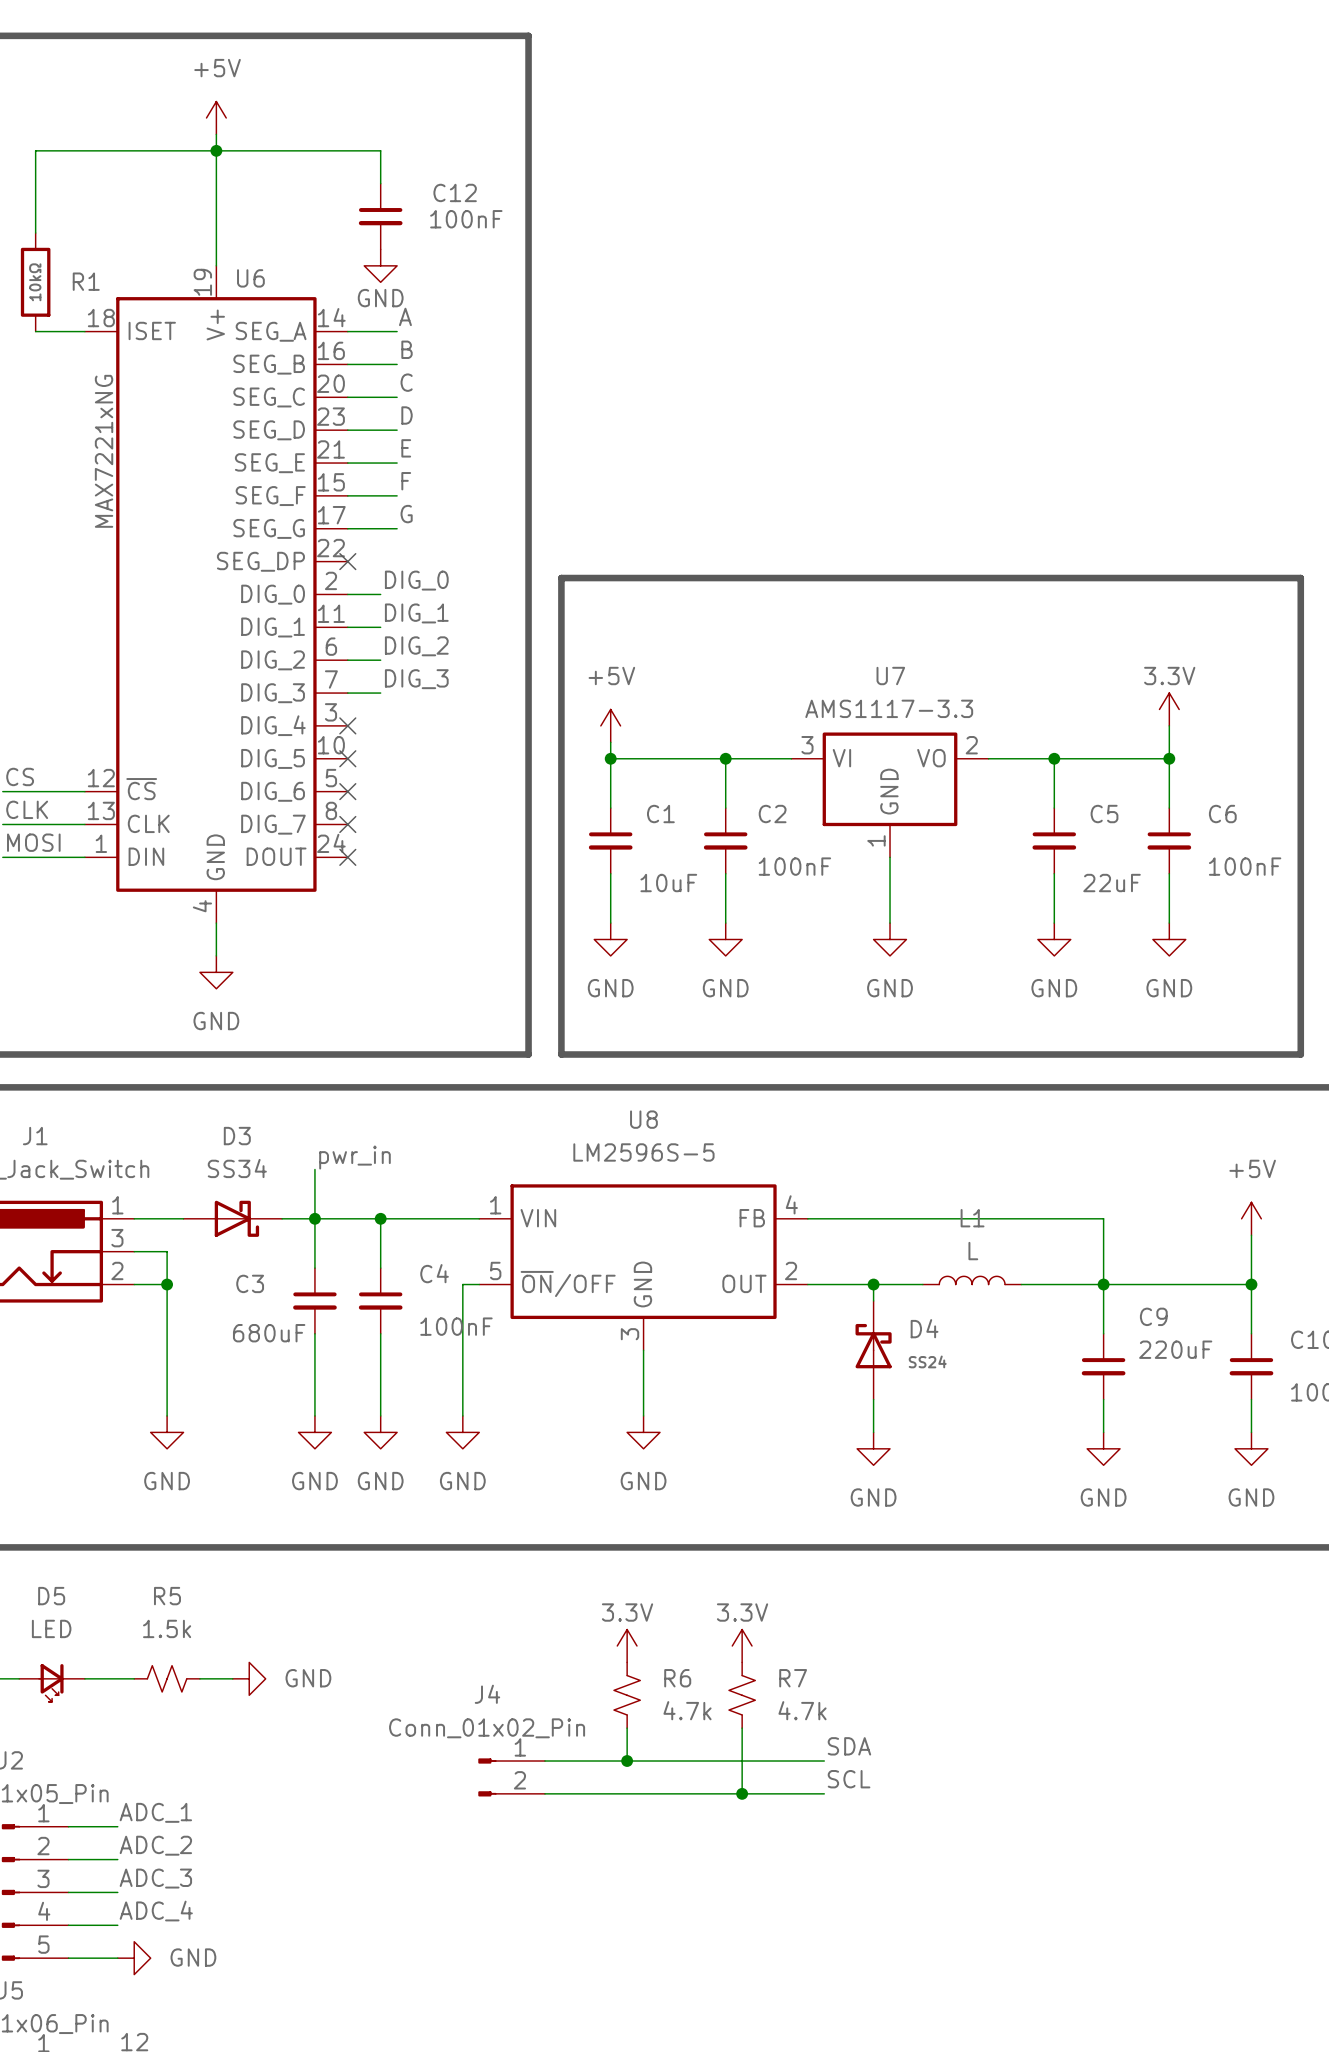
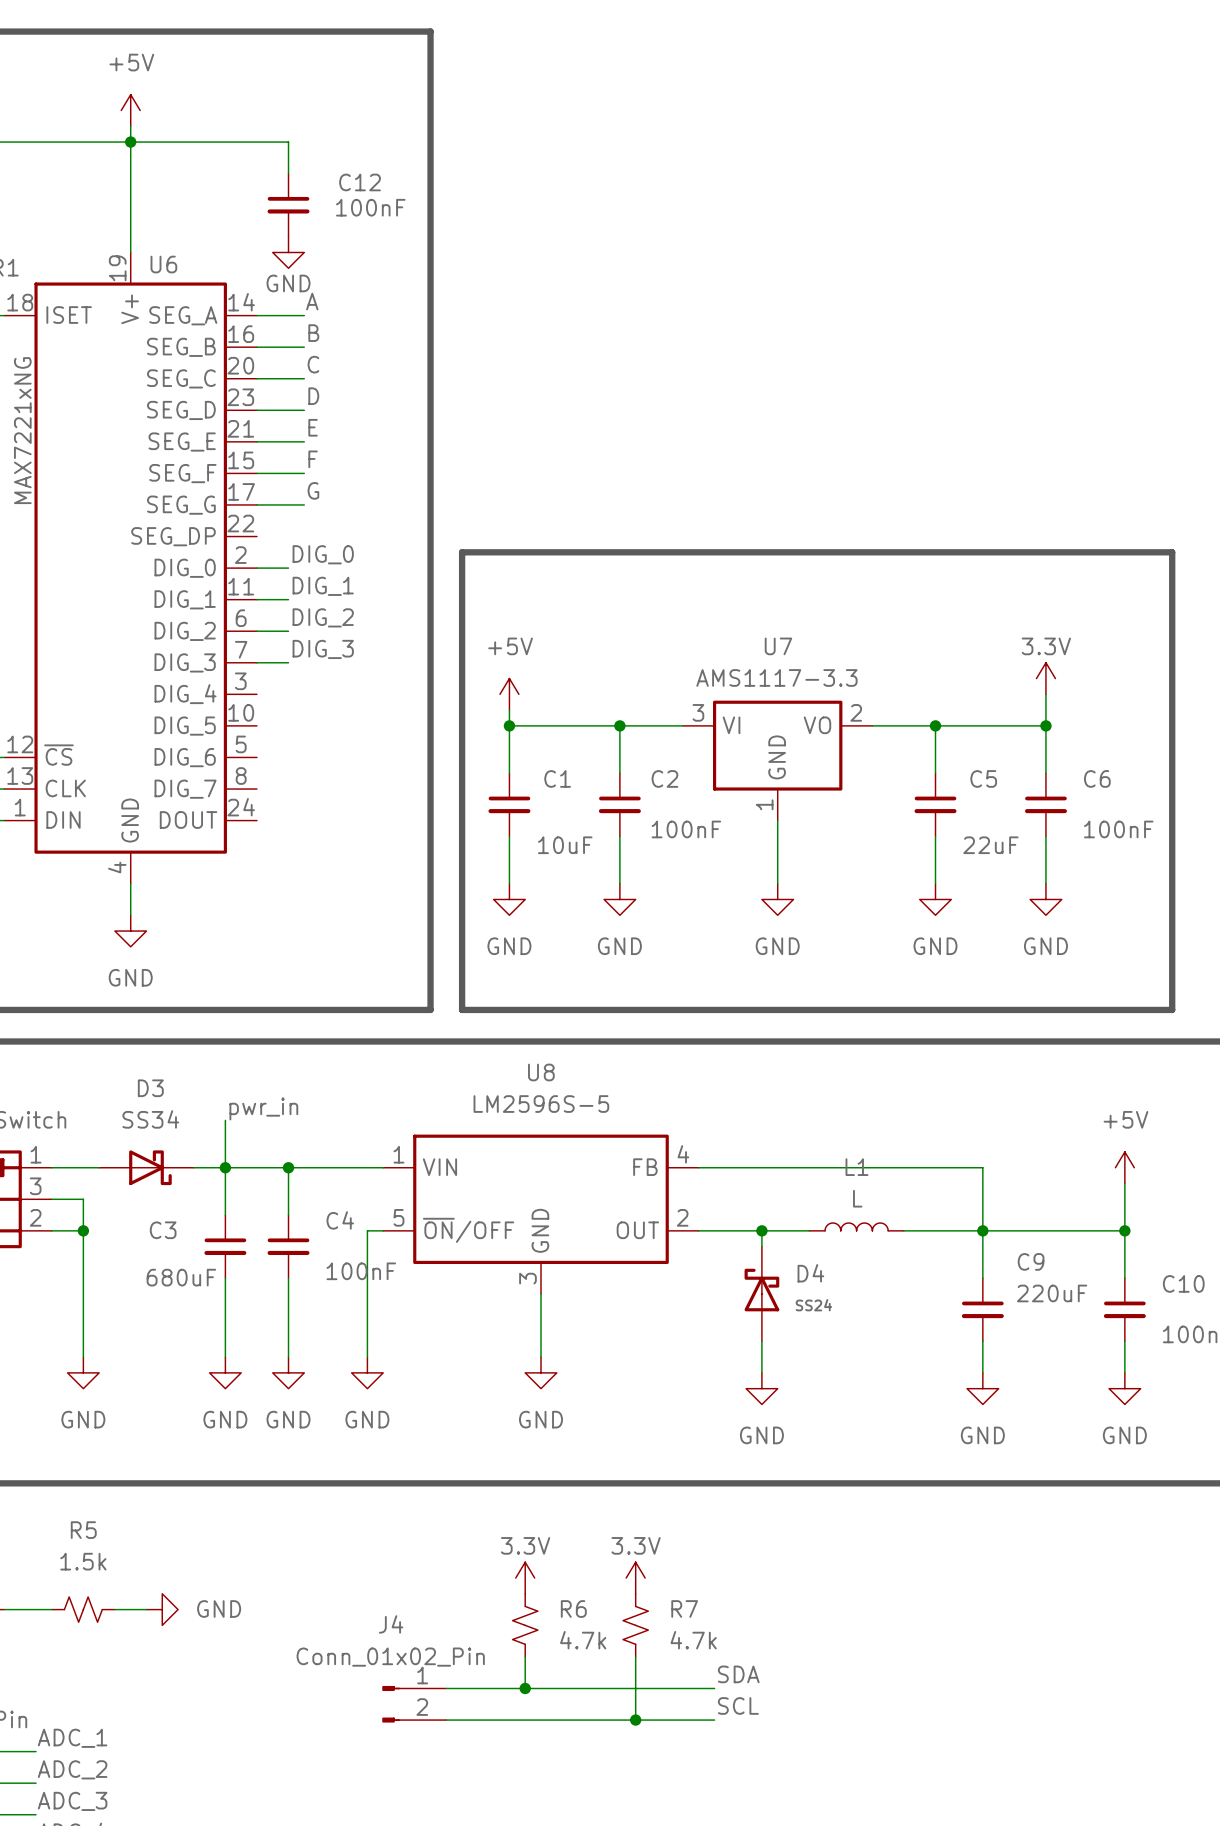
no-connect mark: (347, 561) -> none
no-connect mark: (347, 725) -> none
no-connect mark: (347, 758) -> none
no-connect mark: (347, 791) -> none
no-connect mark: (347, 824) -> none
no-connect mark: (347, 857) -> none

